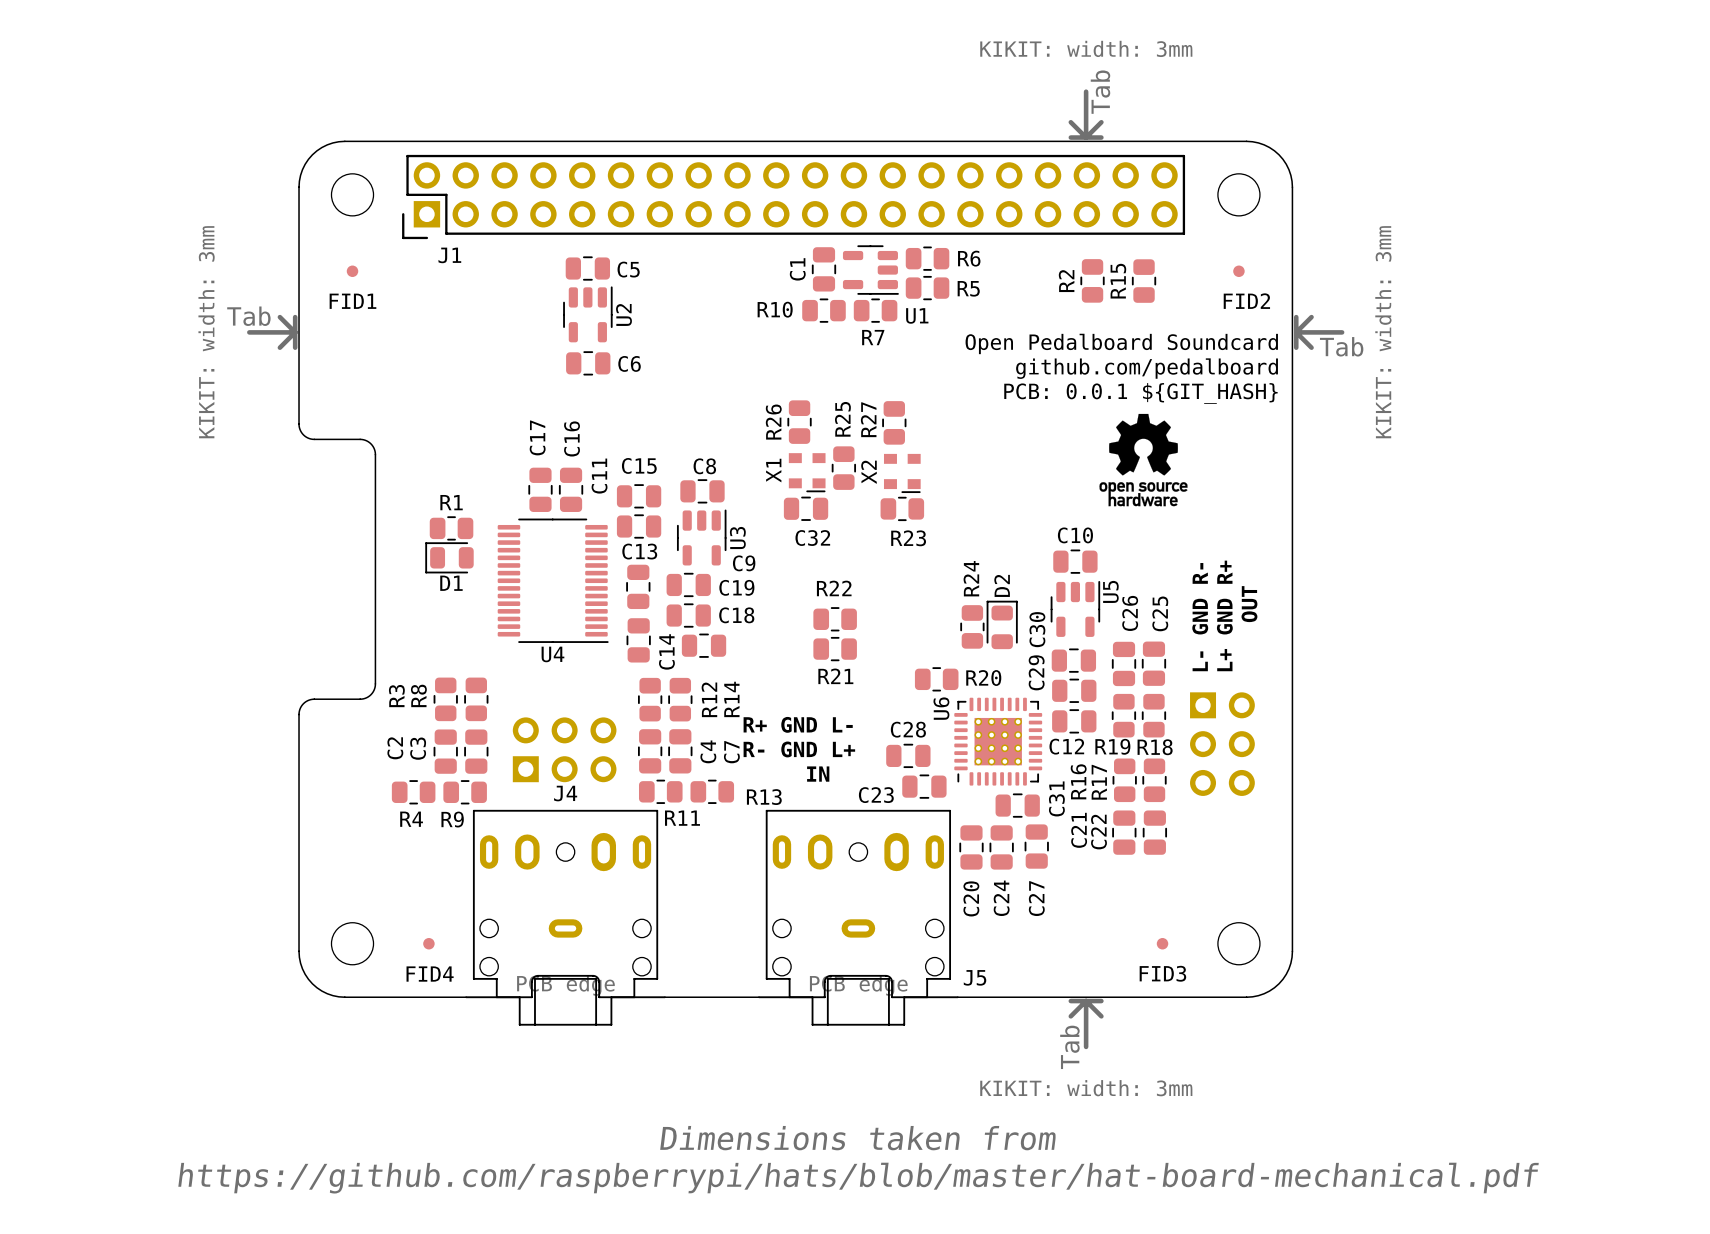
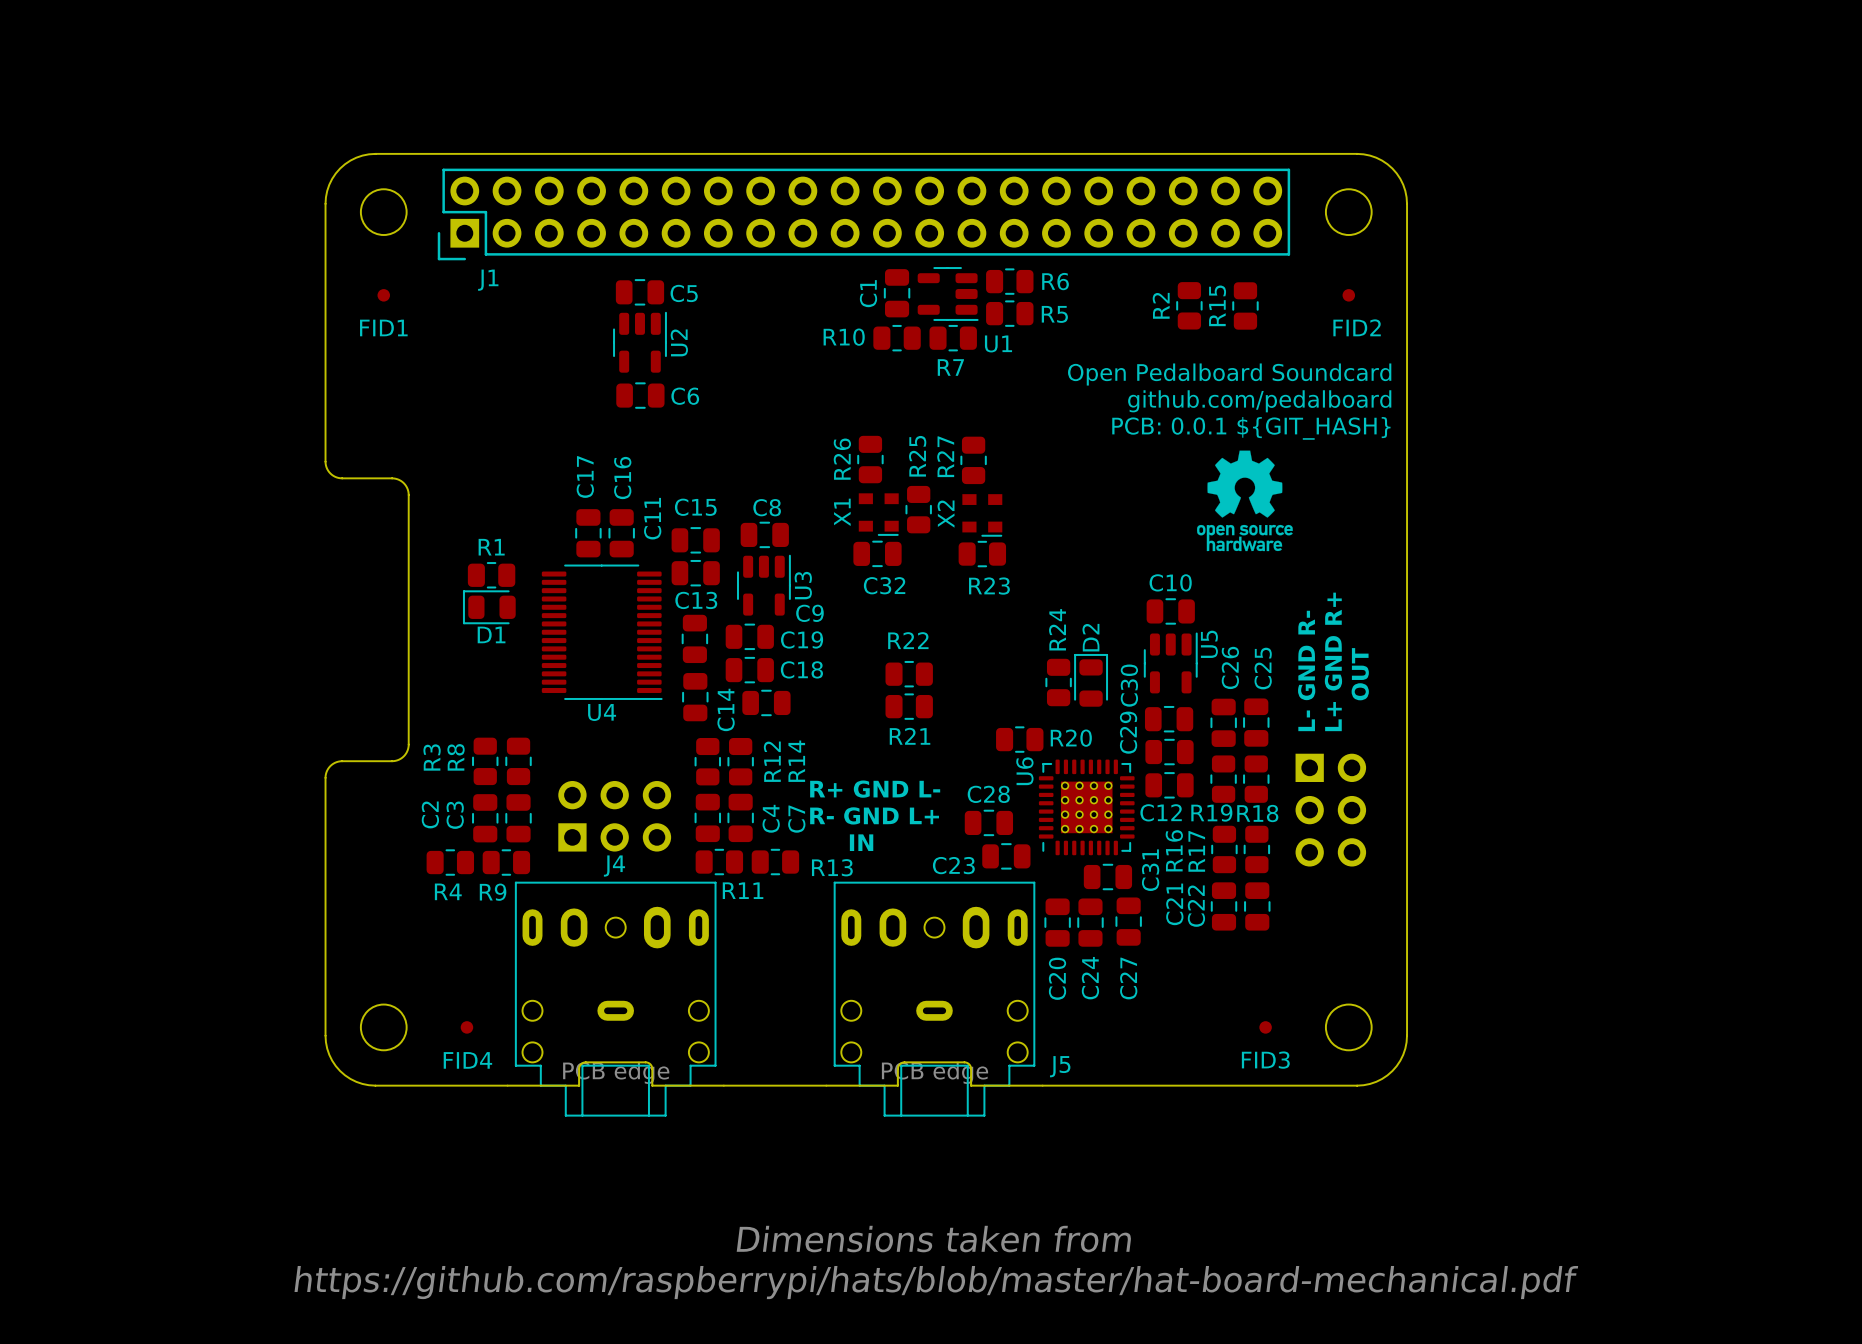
drawing: [1068, 89, 1104, 140] -> none
drawing: [247, 314, 298, 350] -> none
drawing: [1293, 314, 1345, 350] -> none
drawing: [1068, 998, 1104, 1050] -> none

